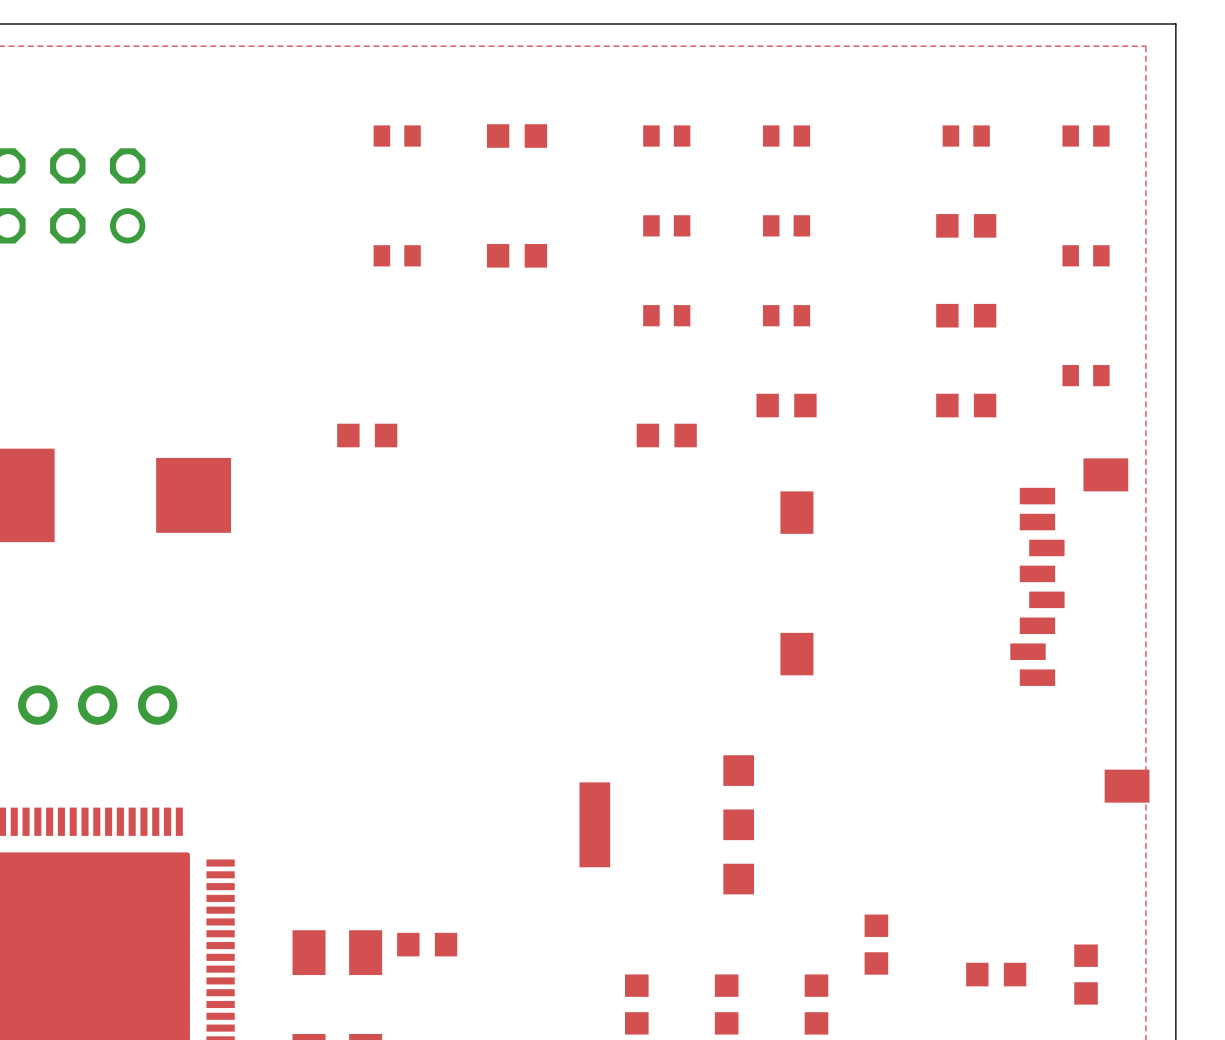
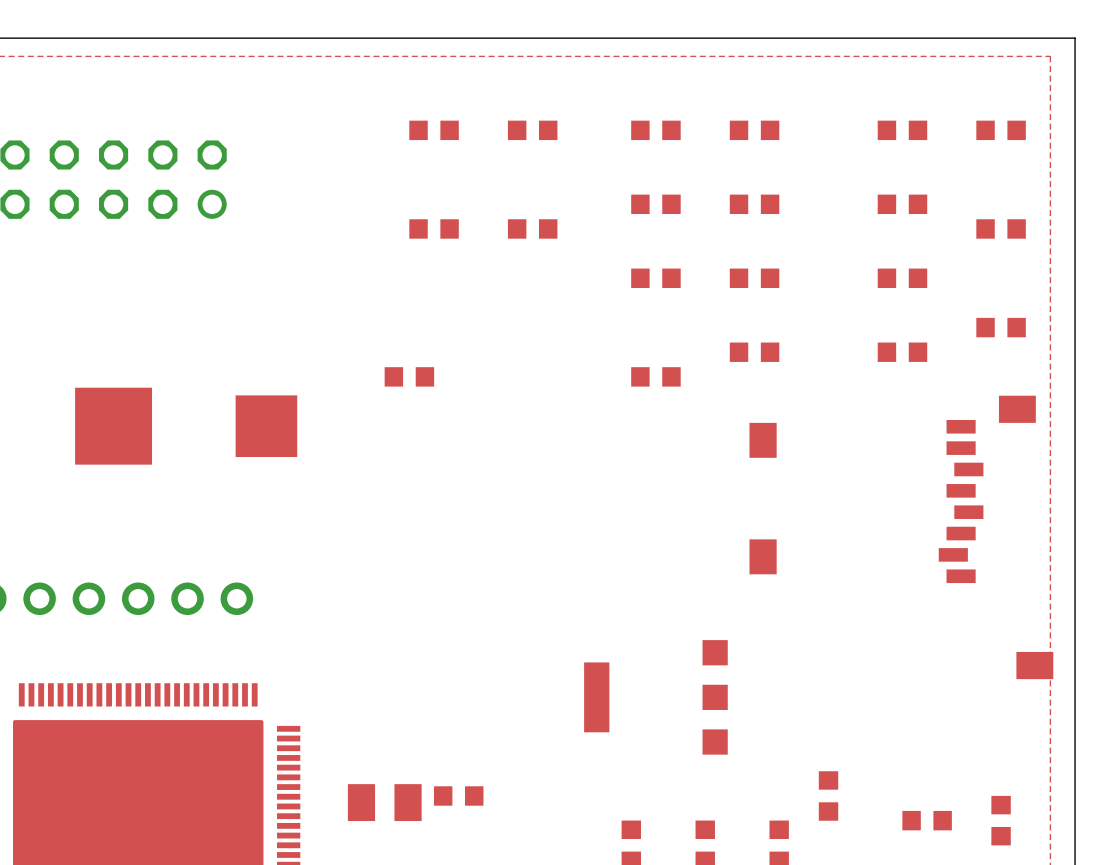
part footprint: [373, 125, 421, 147] -> [409, 120, 459, 141]
part footprint: [643, 125, 691, 147] -> [631, 120, 681, 141]
part footprint: [762, 125, 811, 147] -> [729, 120, 780, 141]
part footprint: [942, 125, 990, 147] -> [877, 120, 928, 141]
part footprint: [1062, 125, 1110, 147] -> [976, 120, 1026, 141]
part footprint: [643, 215, 691, 237] -> [631, 194, 681, 215]
part footprint: [762, 215, 811, 237] -> [729, 194, 780, 215]
part footprint: [373, 245, 421, 267] -> [409, 219, 459, 239]
part footprint: [1062, 245, 1110, 267] -> [976, 219, 1026, 239]
part footprint: [643, 305, 691, 327] -> [631, 268, 681, 288]
part footprint: [762, 305, 811, 327] -> [729, 268, 780, 288]
part footprint: [1062, 364, 1110, 387] -> [976, 317, 1026, 338]

